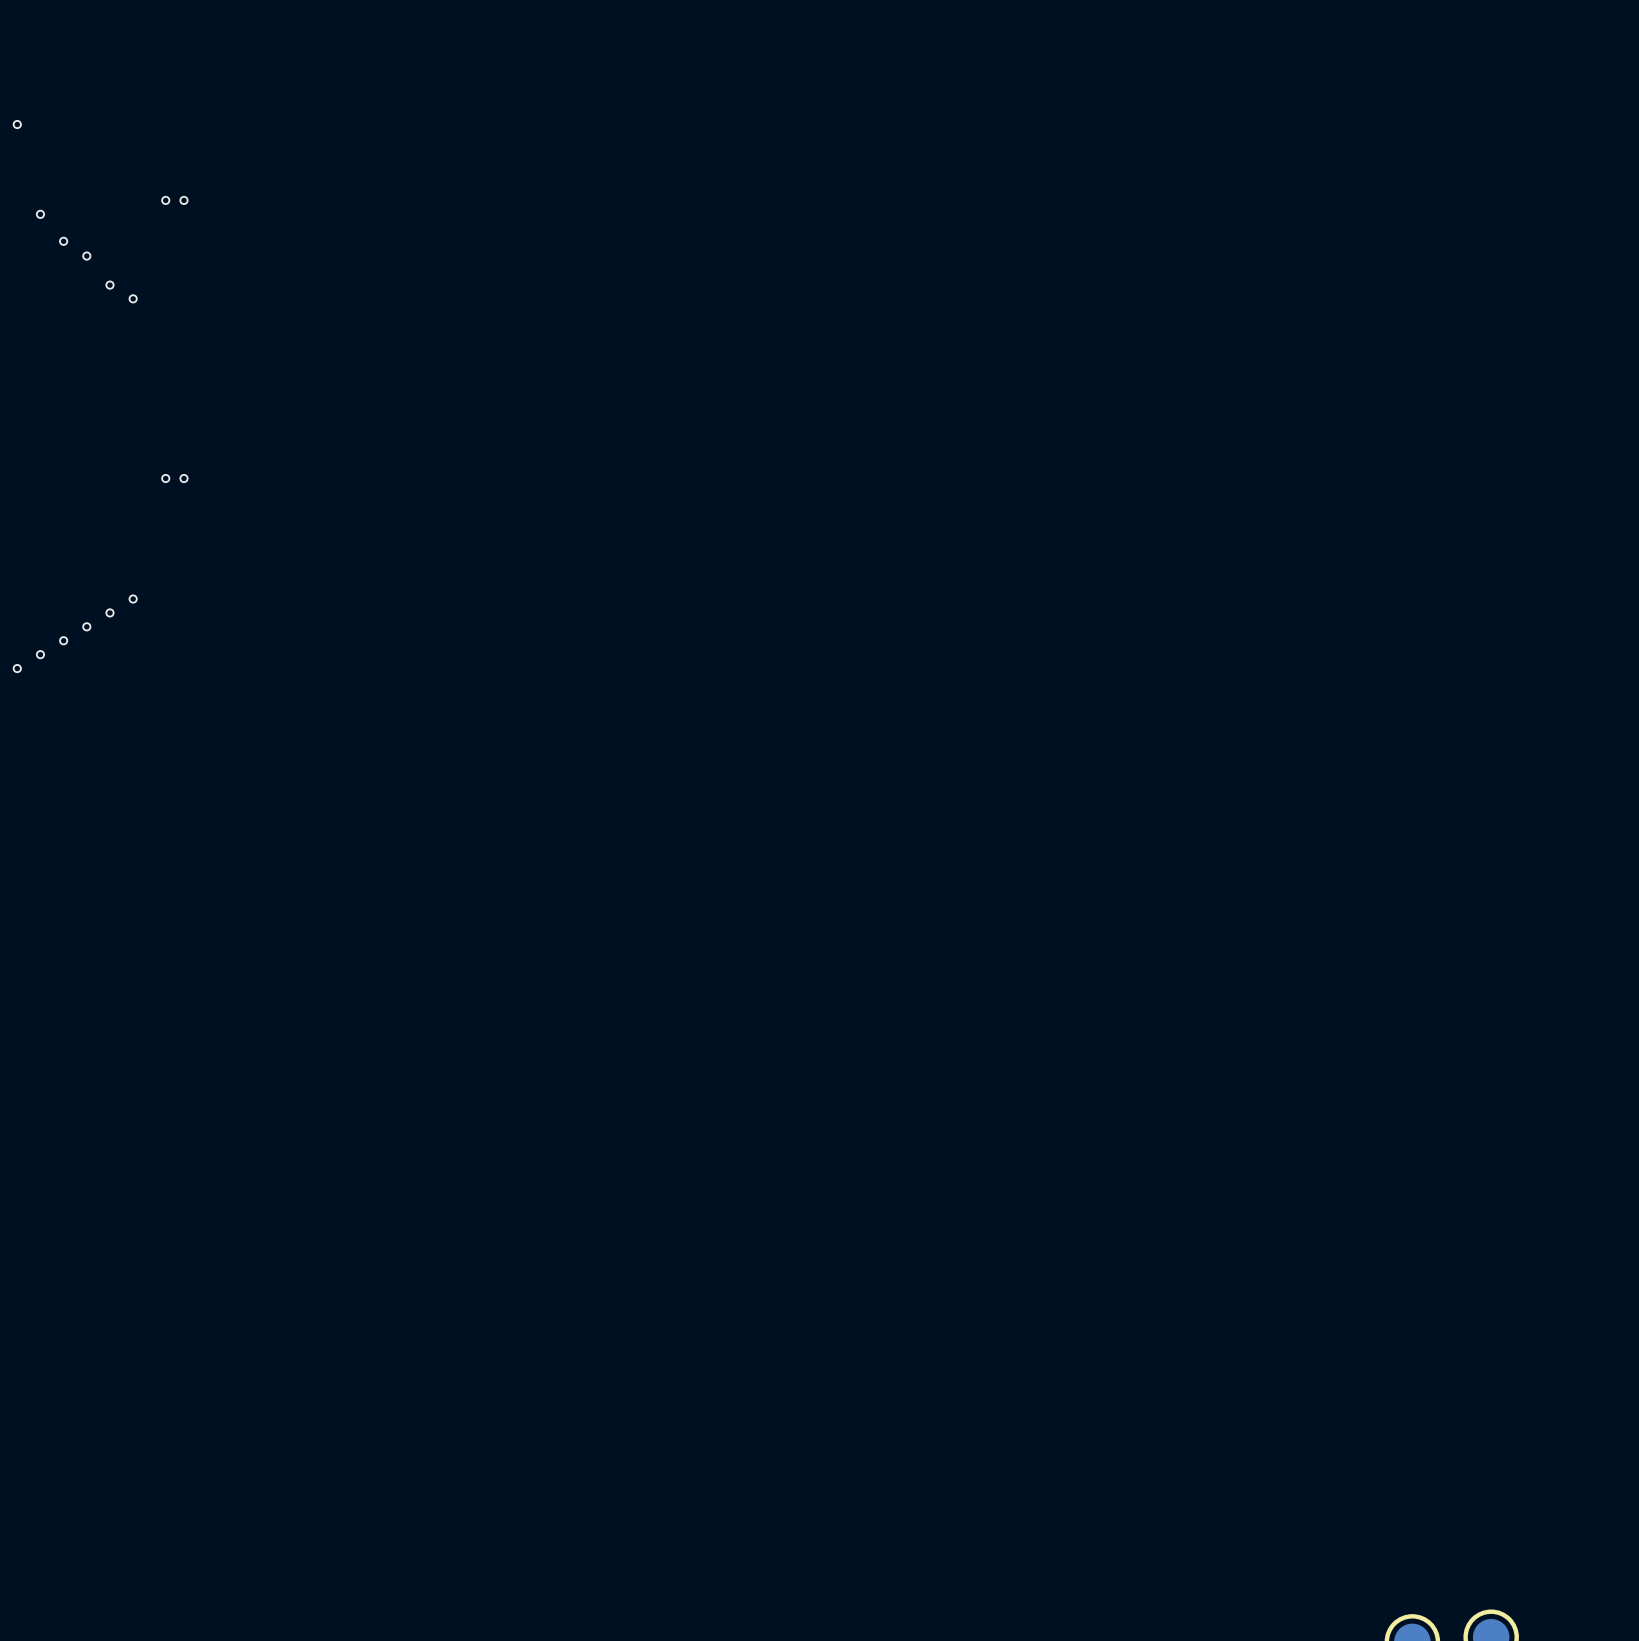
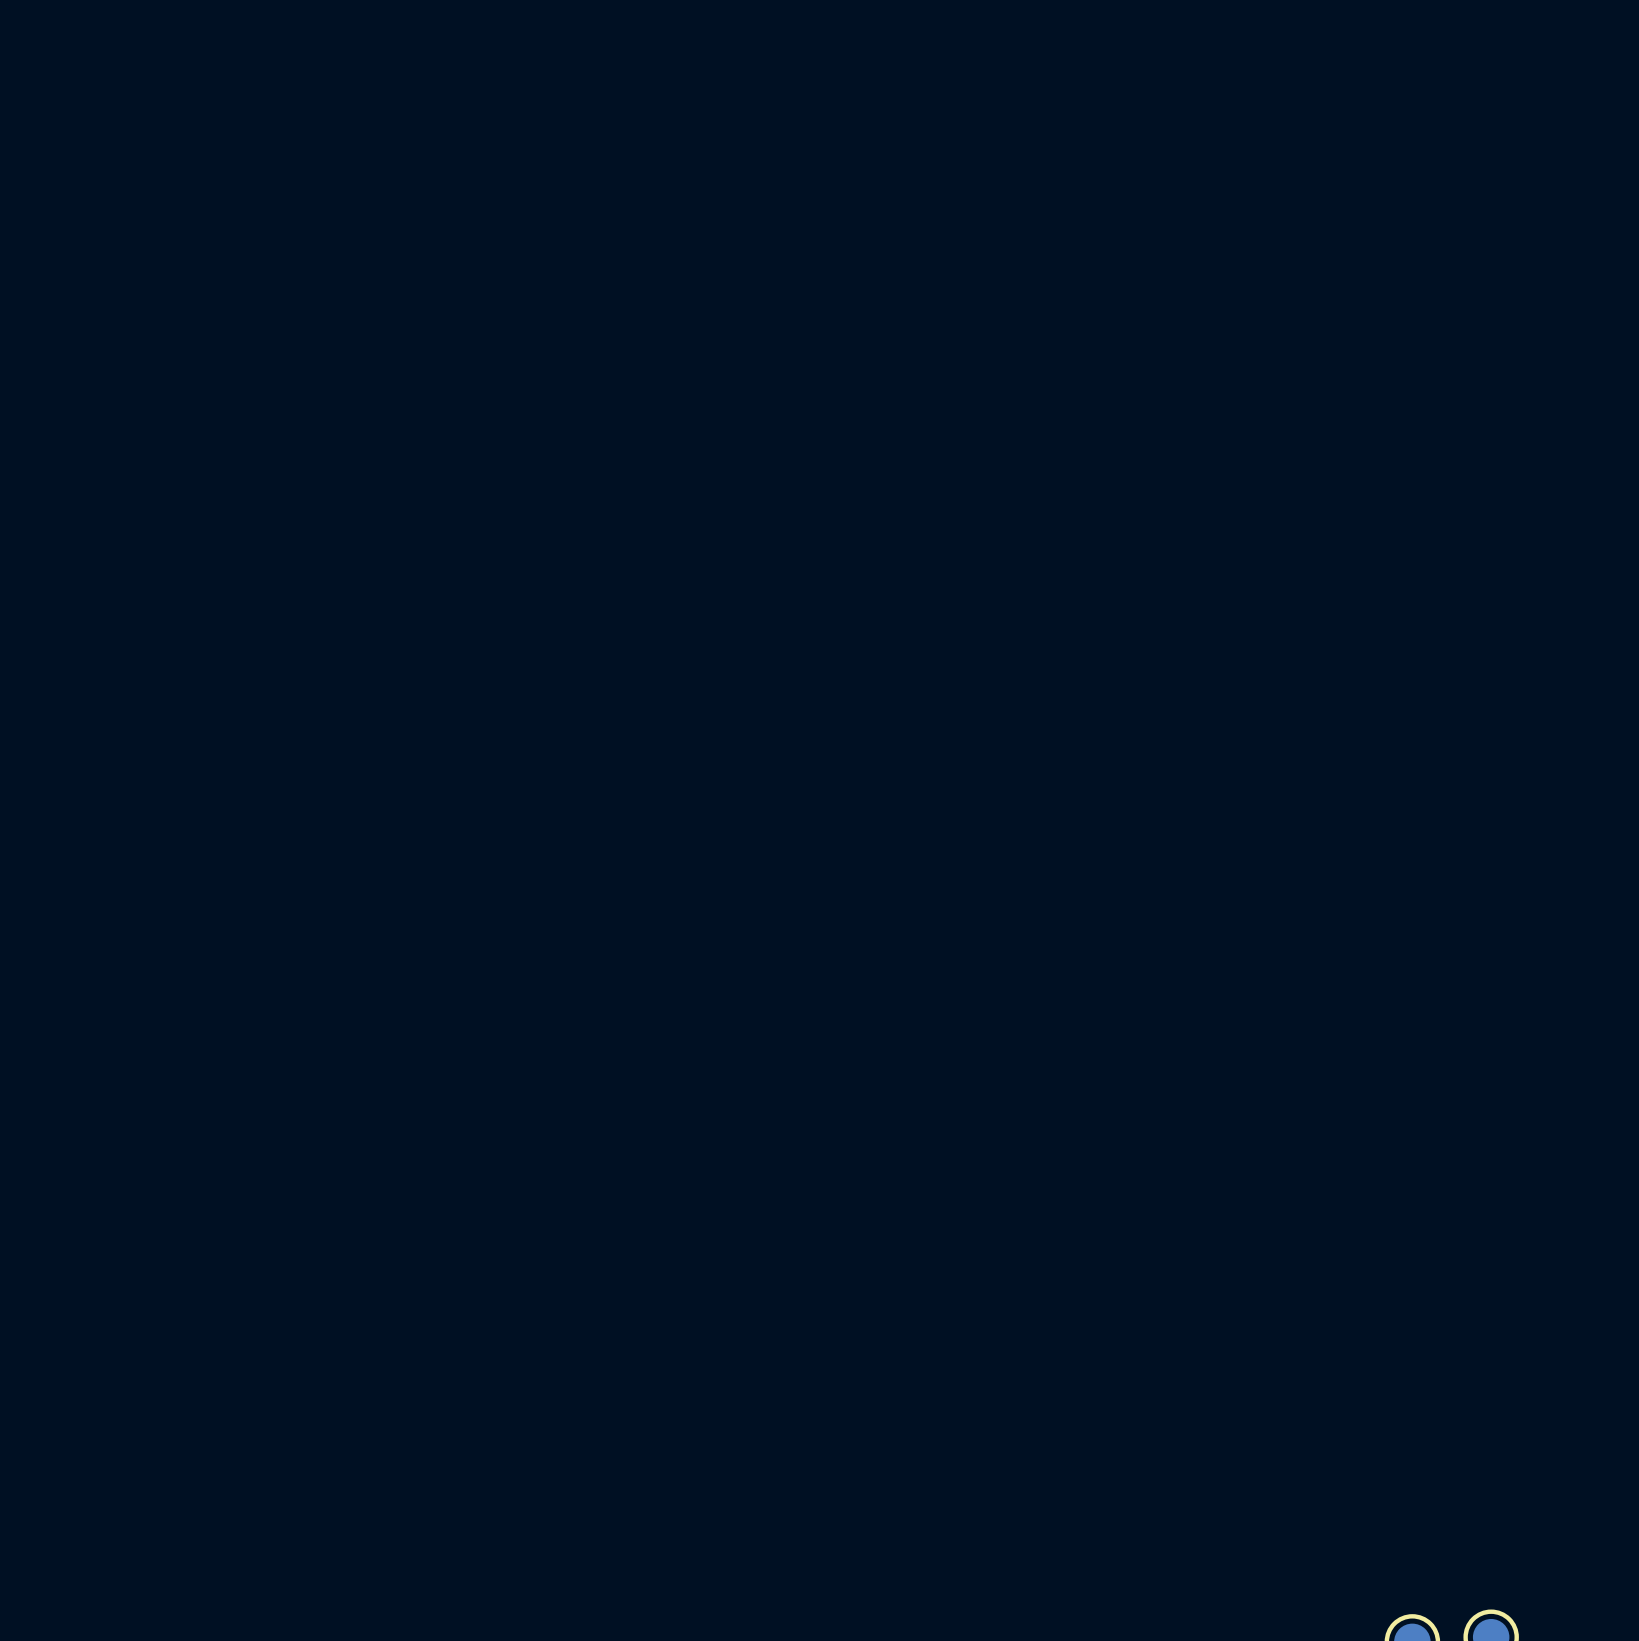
via: (17, 124) -> none
via: (165, 200) -> none
via: (183, 200) -> none
via: (40, 214) -> none
via: (63, 241) -> none
via: (86, 256) -> none
via: (109, 285) -> none
via: (133, 298) -> none
via: (165, 478) -> none
via: (183, 478) -> none
via: (133, 599) -> none
via: (109, 612) -> none
via: (86, 626) -> none
via: (63, 640) -> none
via: (40, 654) -> none
via: (17, 668) -> none

